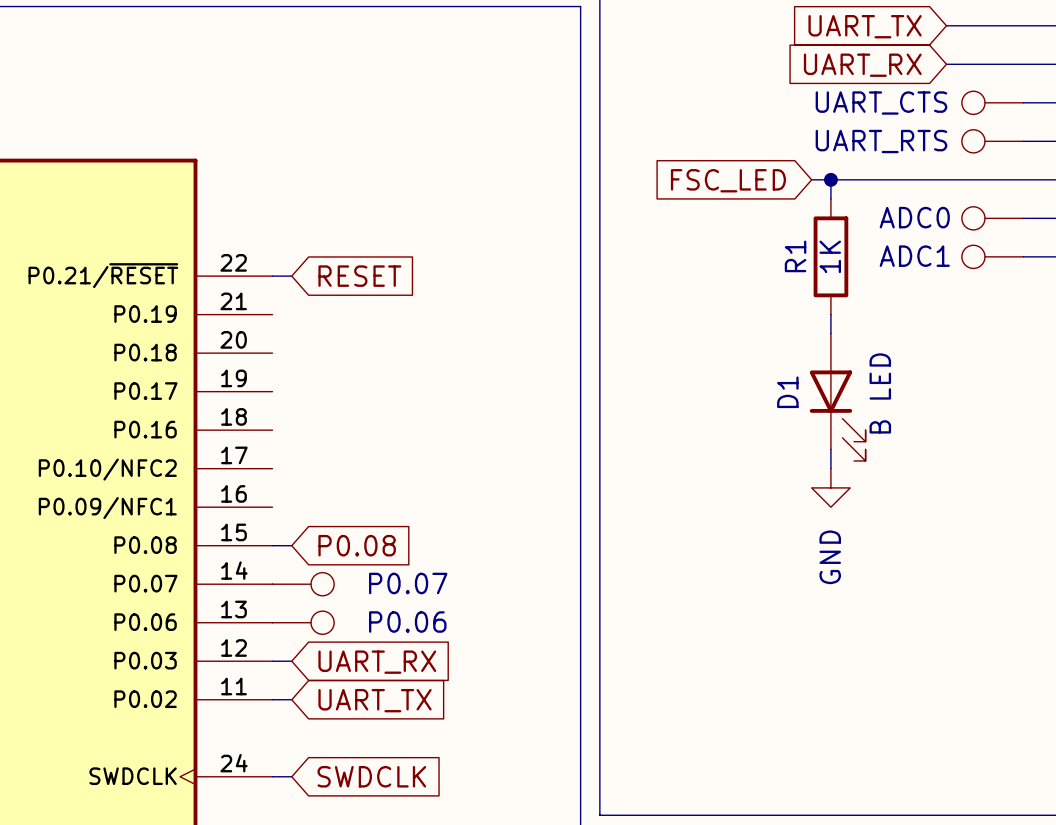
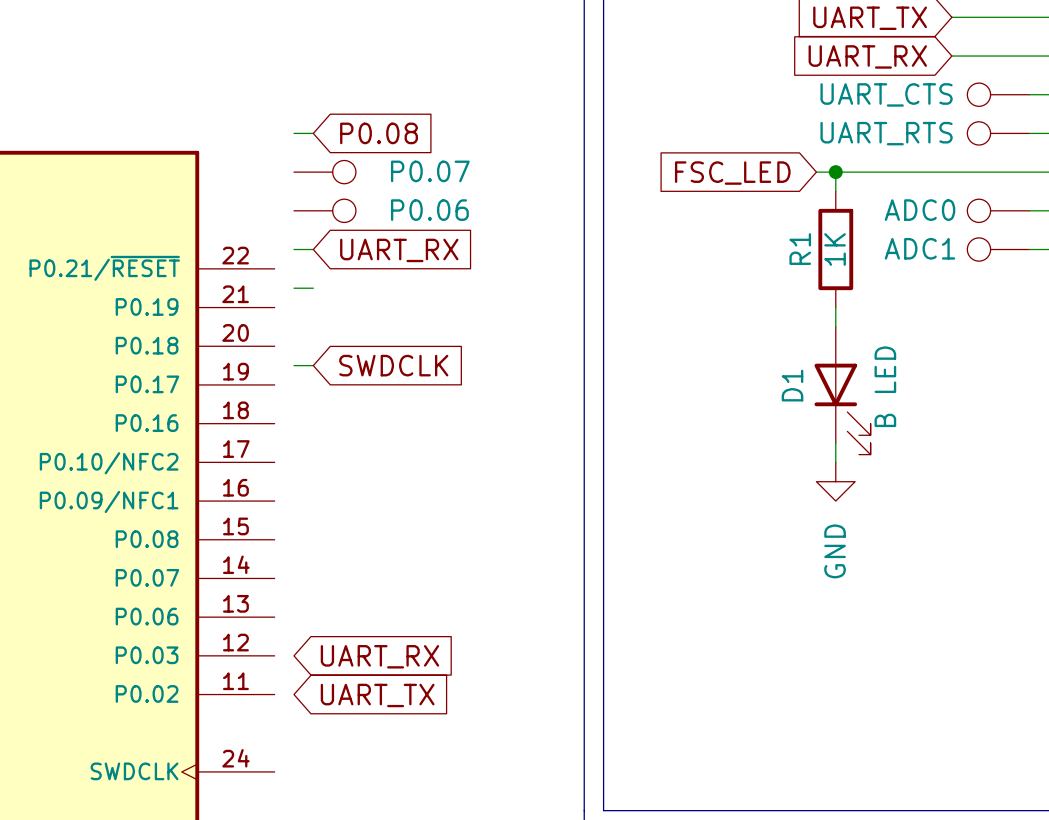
wire: none -> (293, 133) (313, 133)
global label: none -> P0.08 (379, 133)
part: none -> P0.07 (324, 172)
part: none -> P0.06 (324, 210)
global label: none -> UART_RX (399, 250)
wire: (272, 276) (291, 276) -> (293, 288) (313, 288)
global label: RESET (359, 276) -> none
global label: none -> SWDCLK (393, 365)
wire: (272, 545) (291, 545) -> (293, 249) (313, 249)
global label: P0.08 (357, 545) -> none
part: P0.07 (303, 584) -> none
part: P0.06 (303, 622) -> none
wire: (272, 661) (291, 661) -> (293, 365) (313, 365)
wire: (272, 699) (291, 699) -> none
wire: (272, 776) (291, 776) -> none
global label: SWDCLK (371, 776) -> none

